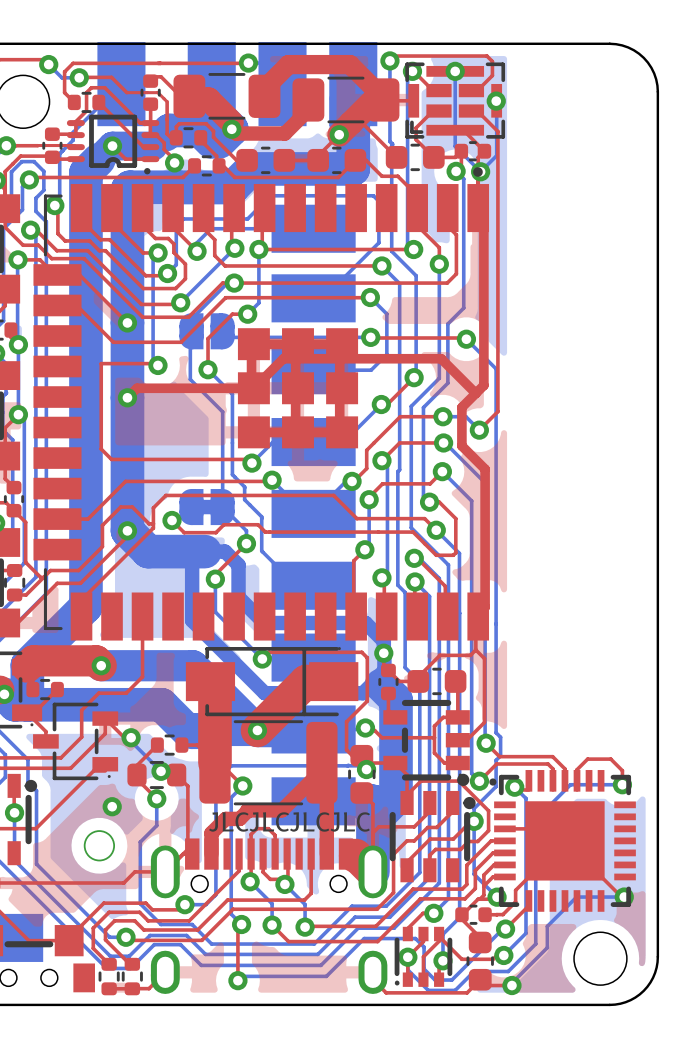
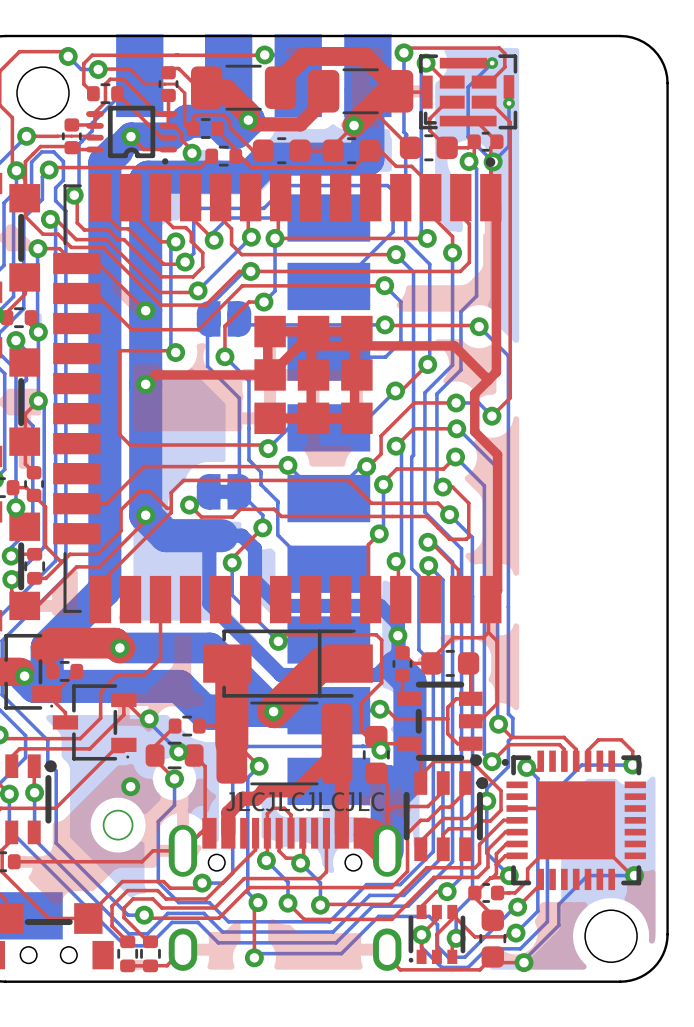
part footprint: [405, 62, 506, 139] -> [419, 54, 518, 130]
bottom track: (455, 71) (455, 95) -> (492, 63) (468, 87)
via: (455, 71) -> none
via: none -> (492, 63)
via size: [486, 91, 506, 111] -> [503, 97, 515, 110]

